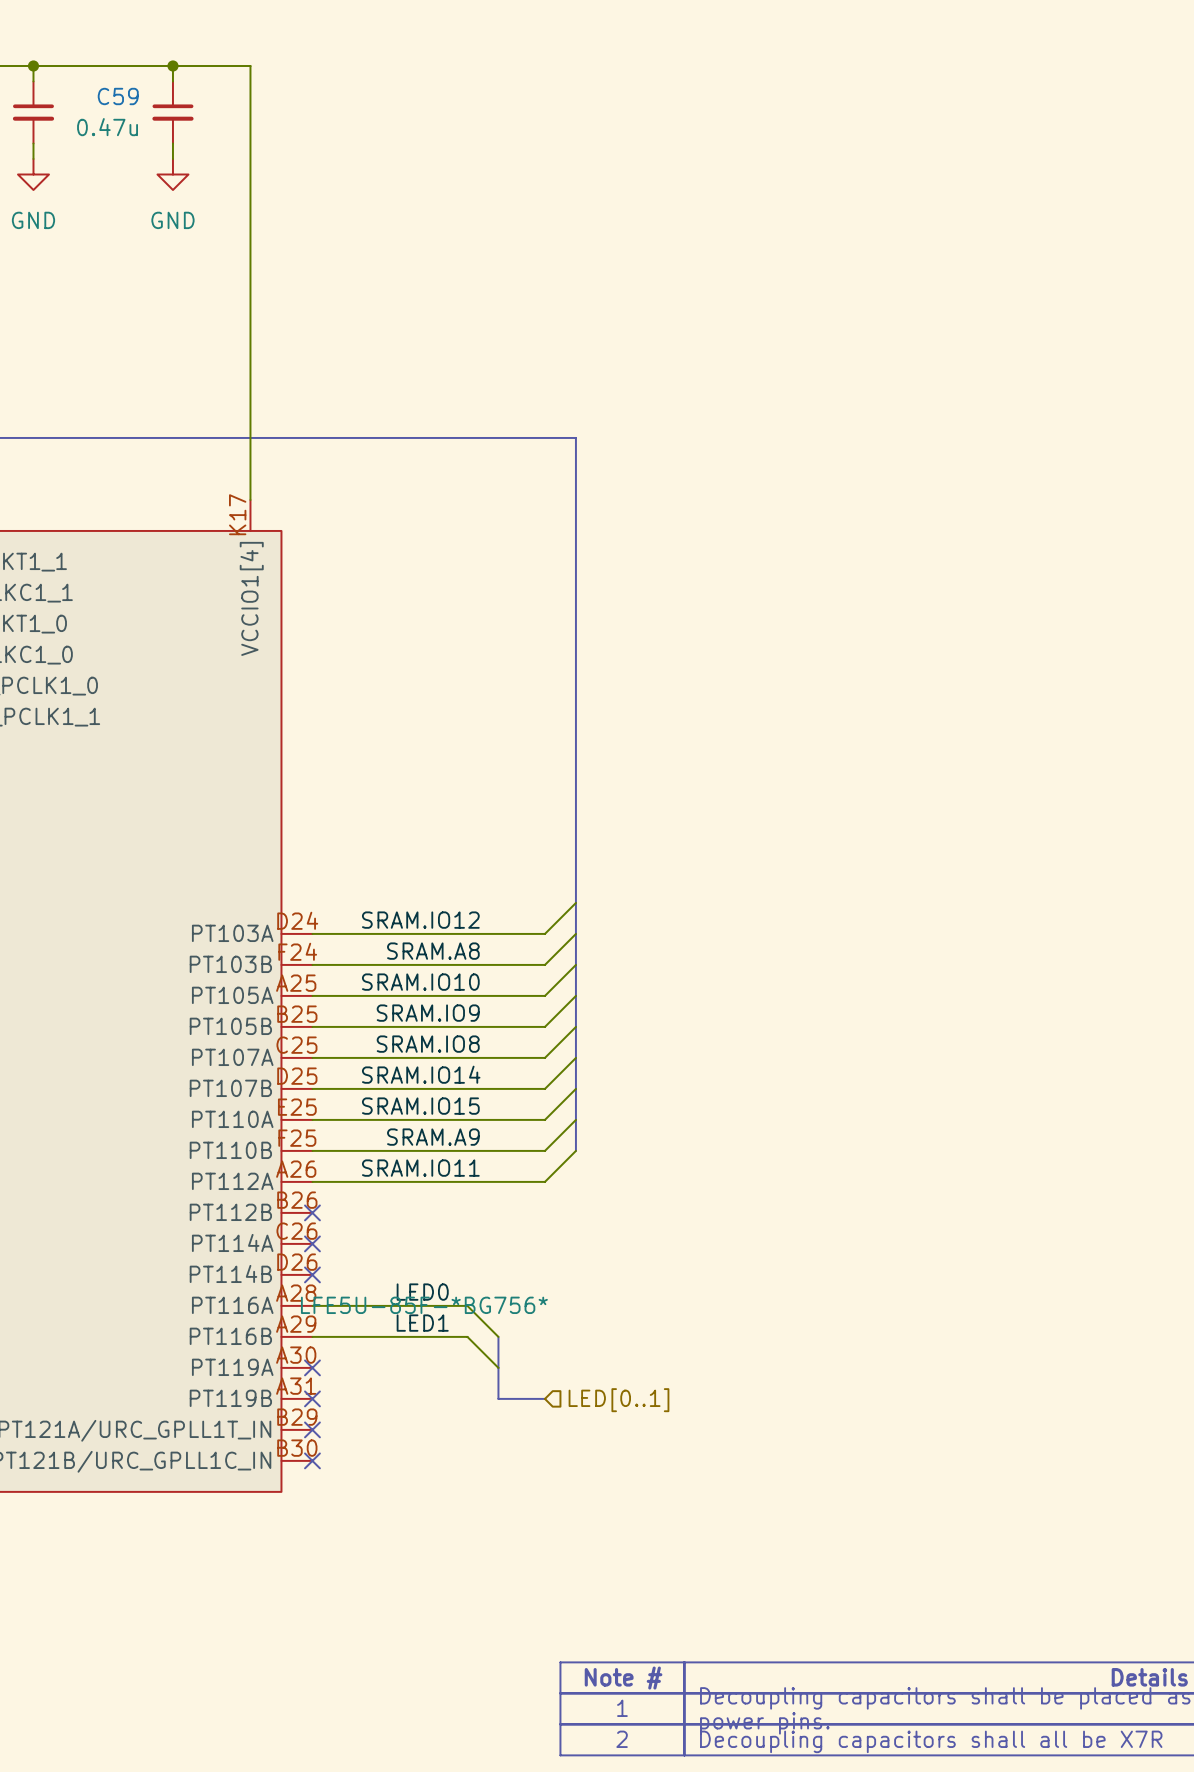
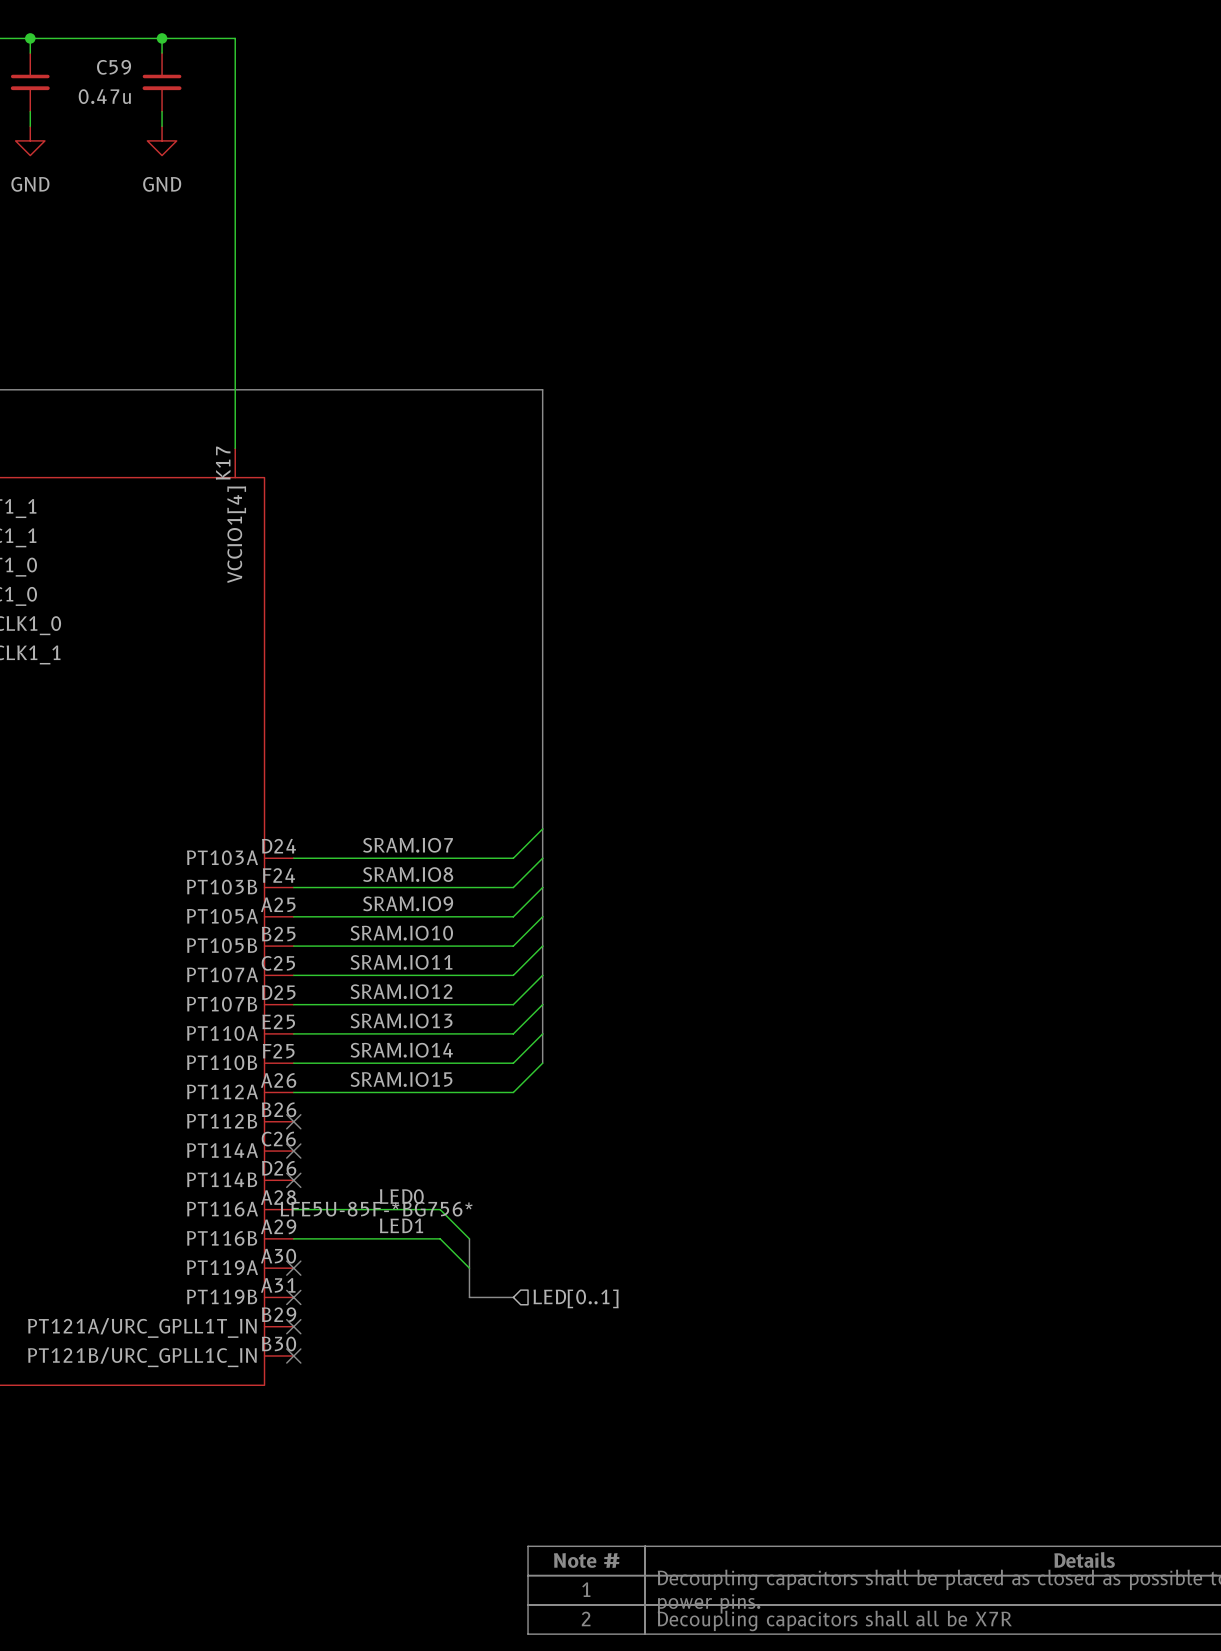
label: SRAM.IO12 (420, 920) -> SRAM.IO7 (408, 845)
label: SRAM.A8 (433, 951) -> SRAM.IO8 (408, 874)
label: SRAM.IO10 (420, 982) -> SRAM.IO9 (408, 903)
label: SRAM.IO9 (428, 1013) -> SRAM.IO10 (401, 933)
label: SRAM.IO8 (428, 1044) -> SRAM.IO11 (401, 962)
label: SRAM.IO14 (421, 1074) -> SRAM.IO12 (401, 991)
label: SRAM.IO15 (420, 1106) -> SRAM.IO13 (401, 1020)
label: SRAM.A9 (433, 1137) -> SRAM.IO14 (401, 1050)
label: SRAM.IO11 (420, 1168) -> SRAM.IO15 (401, 1079)

